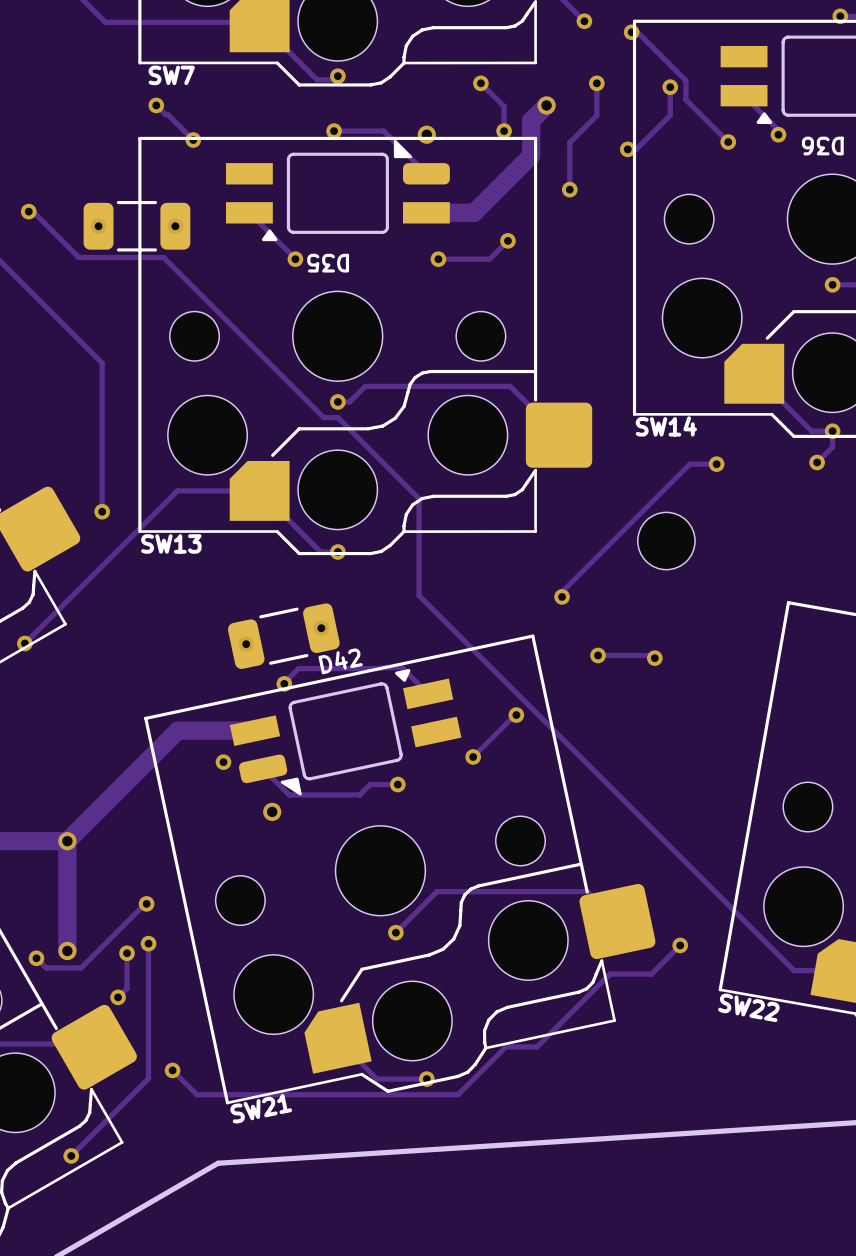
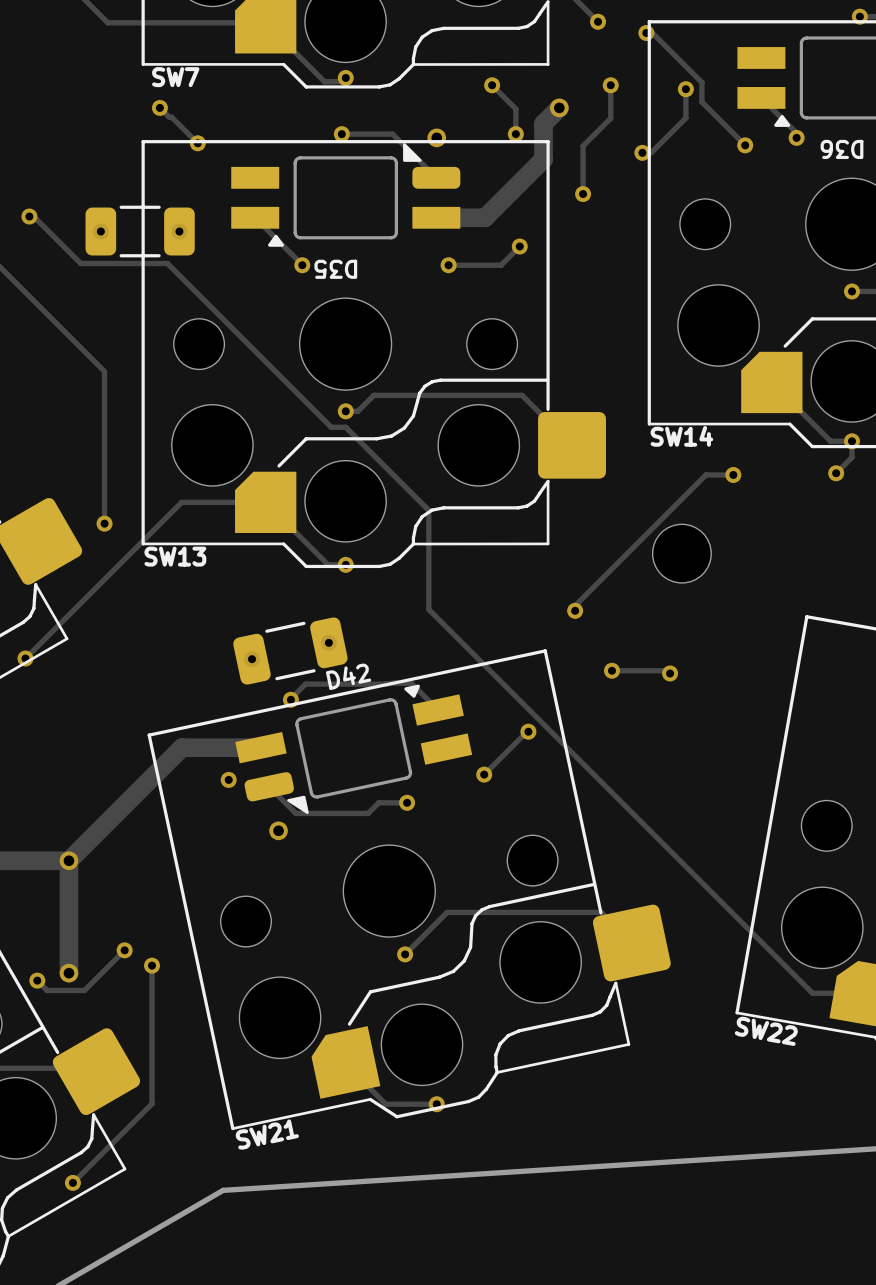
track: (146, 903) (81, 967) -> (124, 950) (83, 990)
via: (146, 903) -> none
via: none -> (124, 950)
track: (680, 945) (651, 974) (609, 974) (537, 1046) (505, 1046) (458, 1094) (196, 1094) (172, 1070) -> none
via: (680, 945) -> none
track: (127, 953) (127, 988) (118, 997) -> none
via: (127, 953) -> none
via: (118, 997) -> none
via: (172, 1070) -> none

